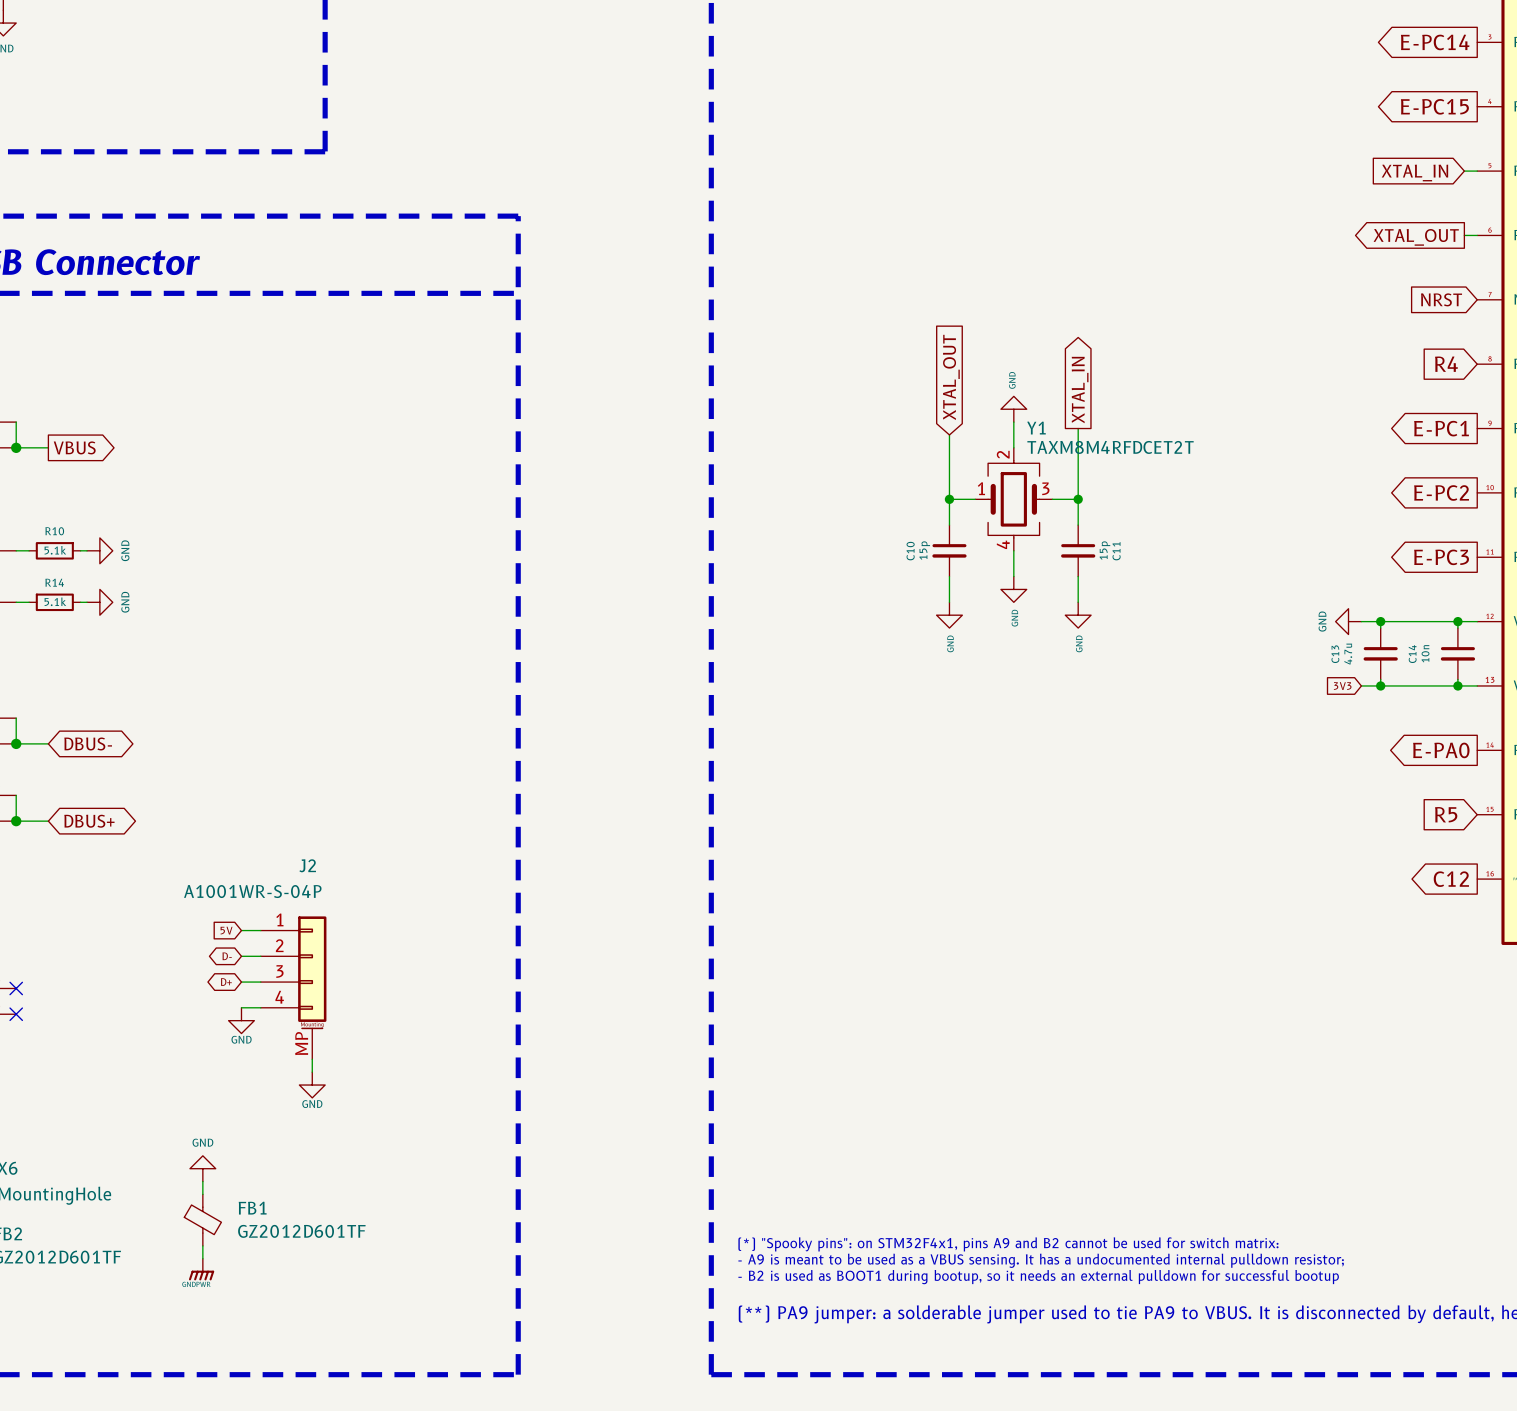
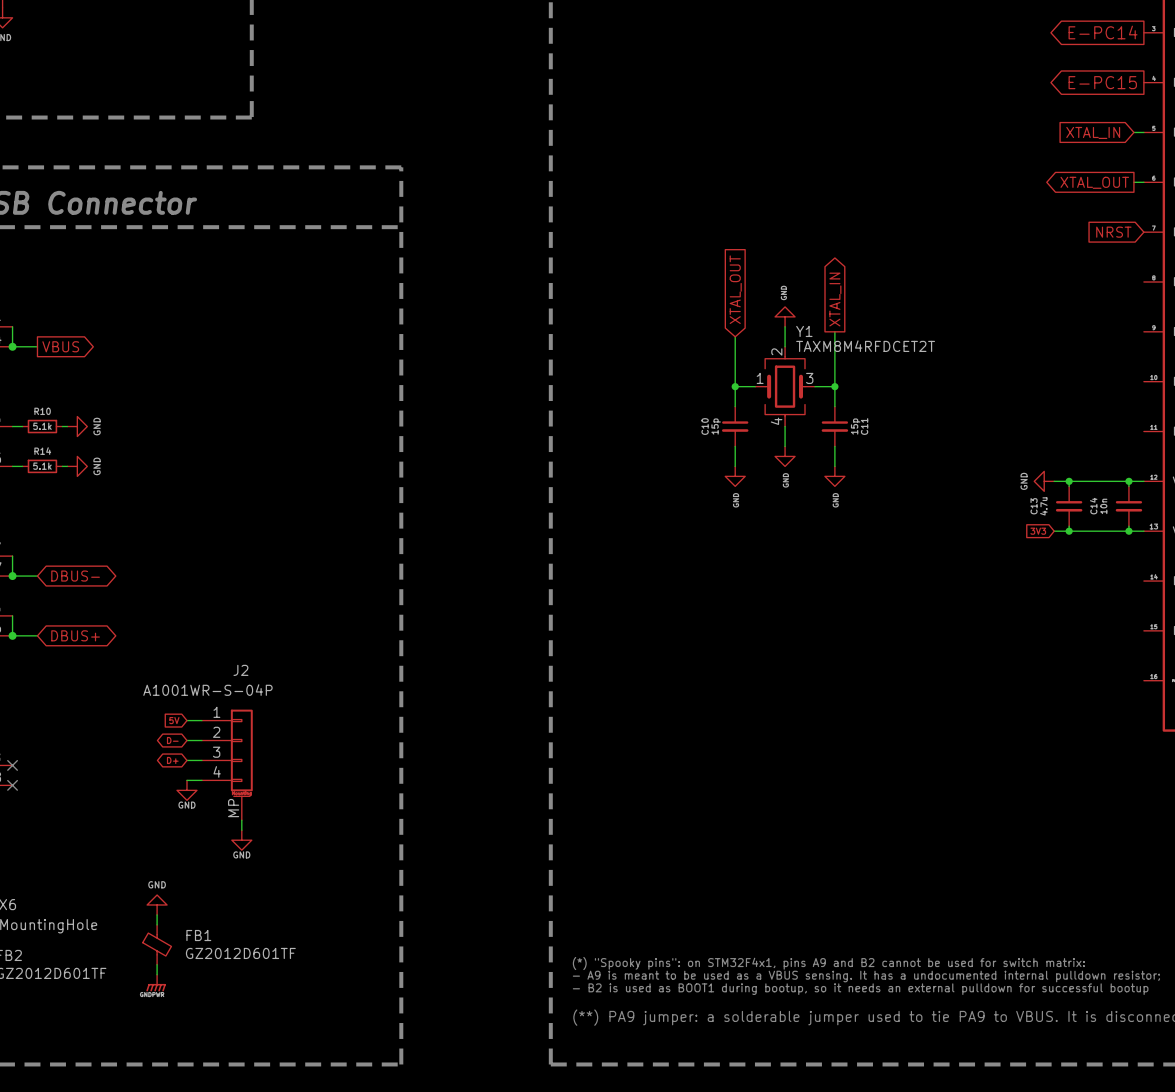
global label: R4 (1446, 364) -> none
global label: E-PC1 (1441, 428) -> none
global label: E-PC2 (1441, 492) -> none
global label: E-PC3 (1441, 557) -> none
global label: E-PA0 (1441, 750) -> none
global label: R5 (1446, 814) -> none
global label: C12 (1451, 879) -> none

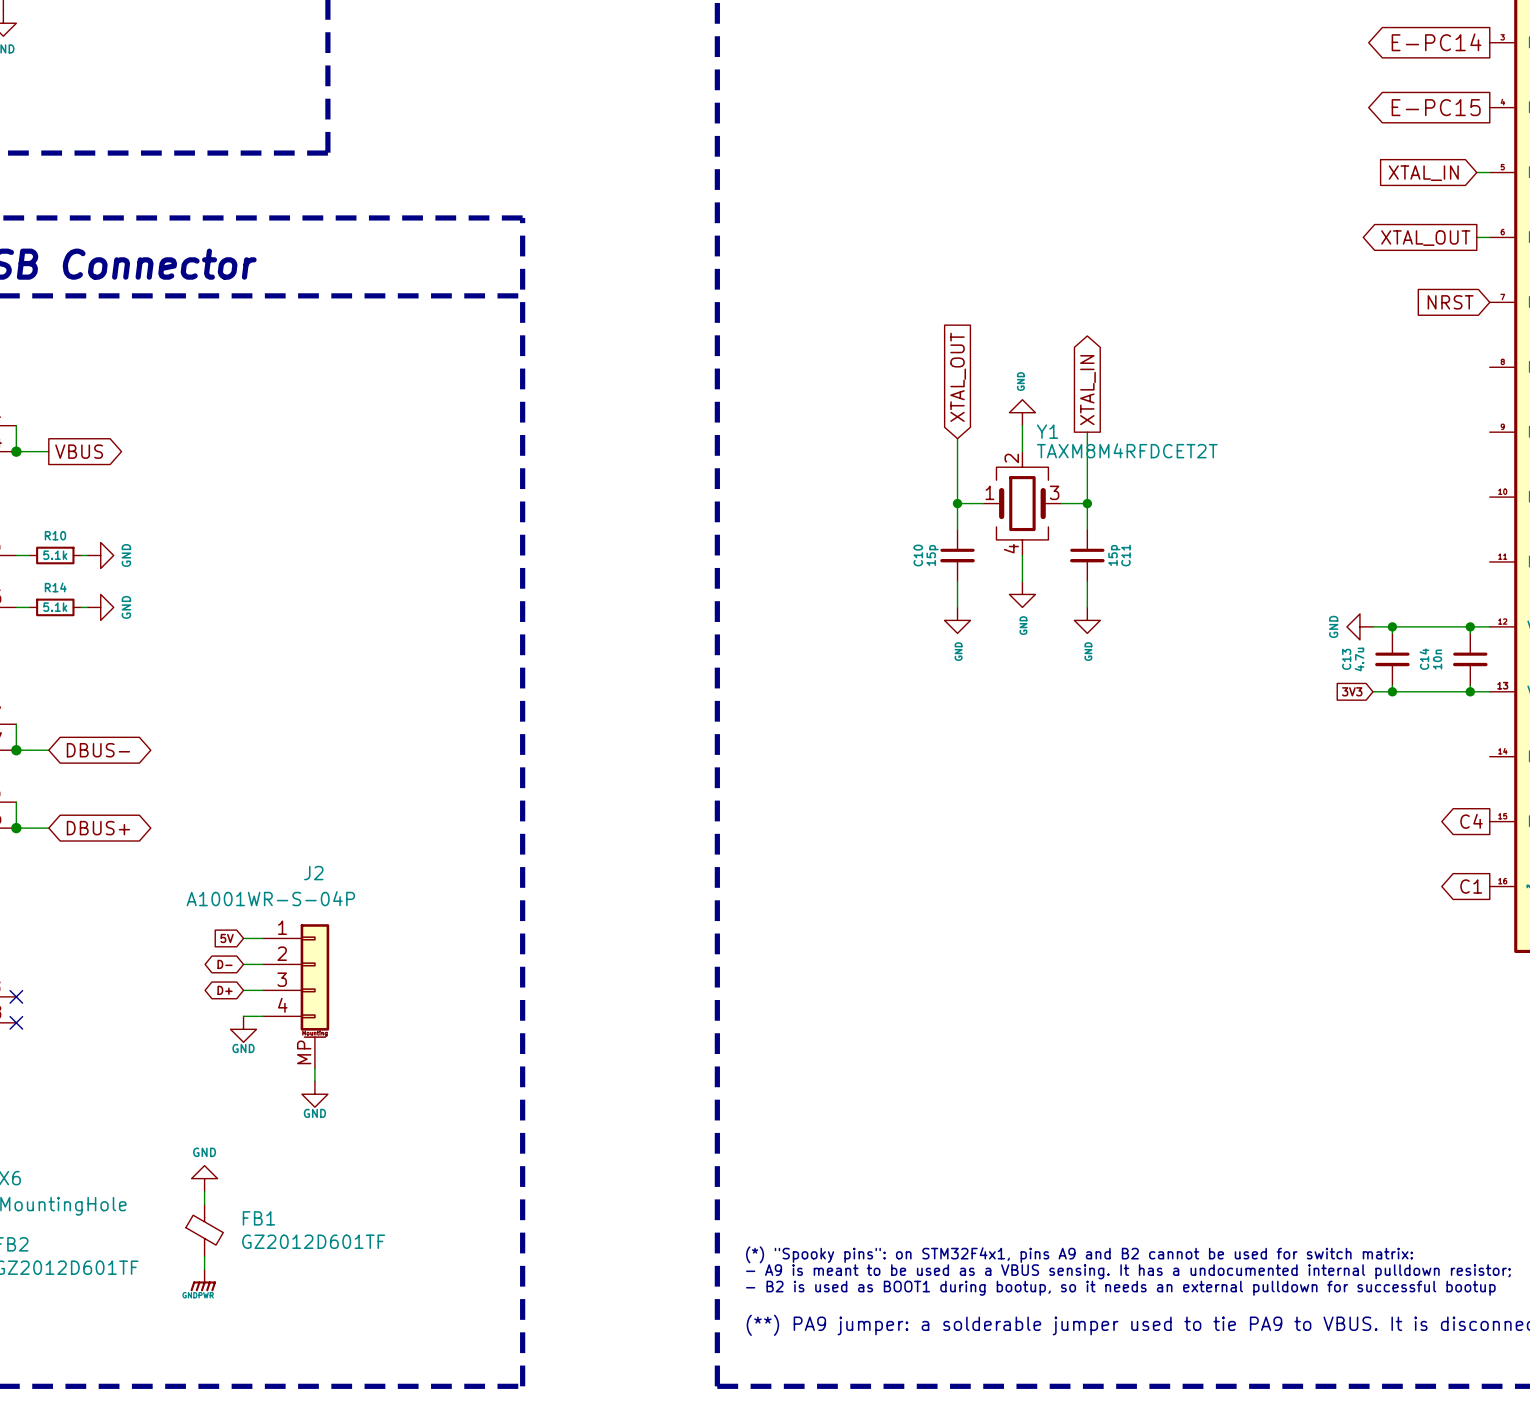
global label: none -> C4 (1471, 821)
global label: none -> C1 (1471, 886)

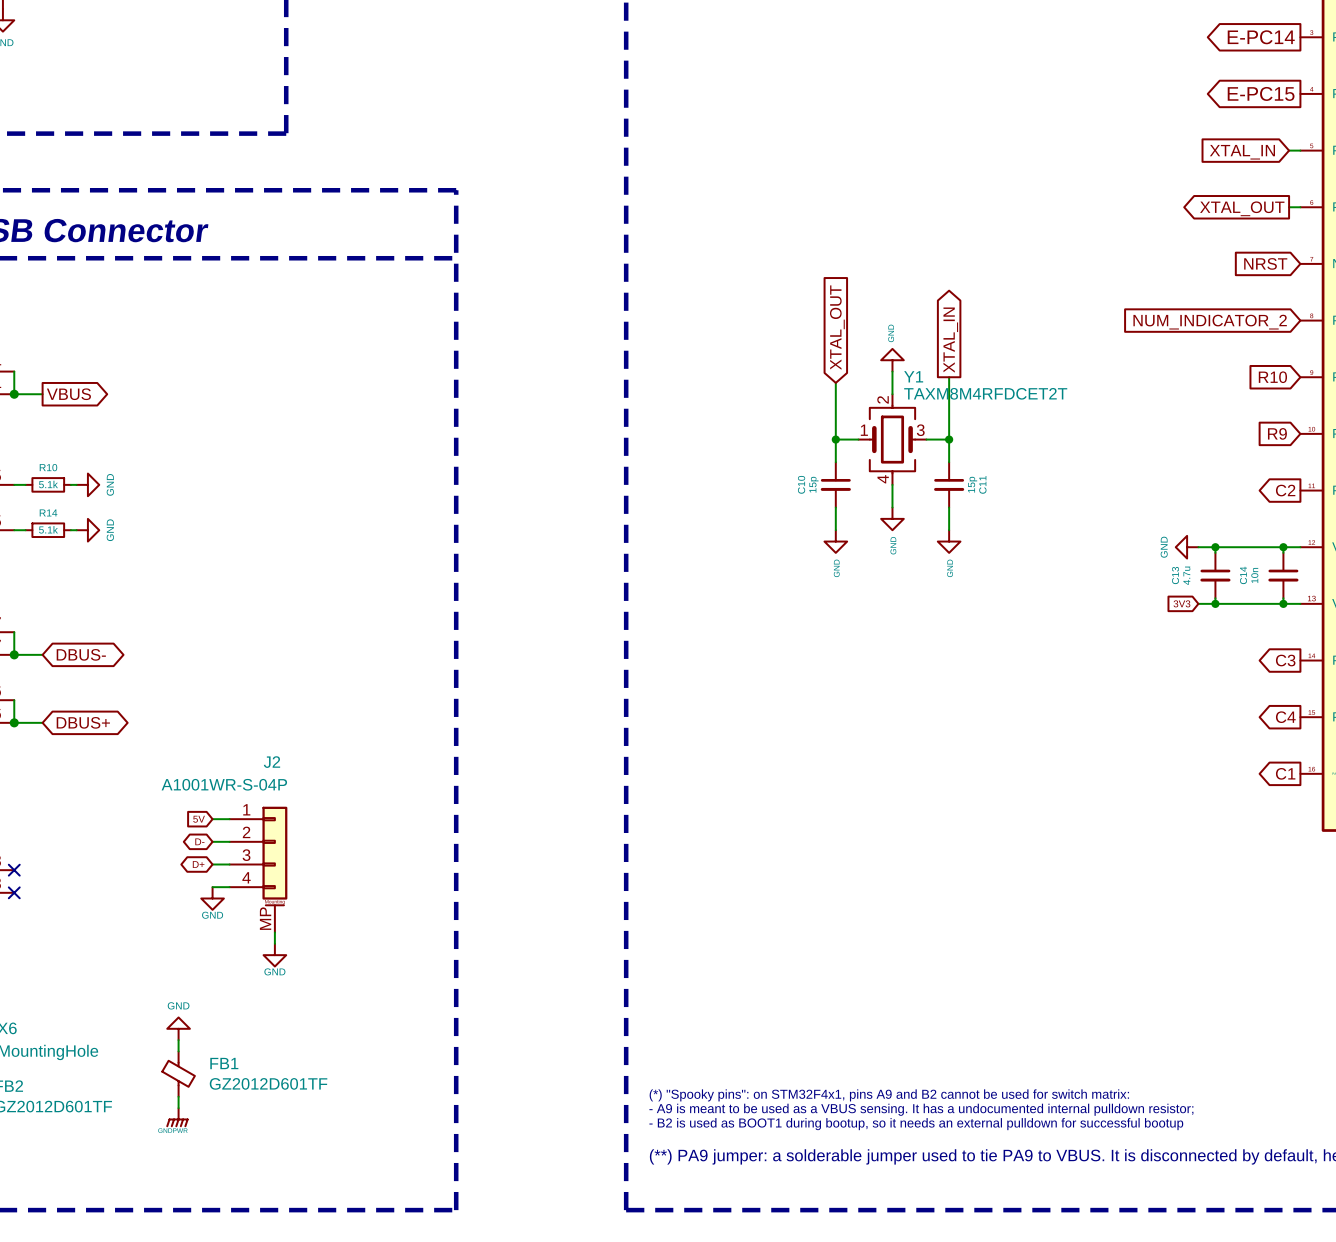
global label: none -> NUM_INDICATOR_2 (1210, 322)
global label: none -> R10 (1272, 377)
global label: none -> R9 (1277, 433)
global label: none -> C2 (1285, 490)
global label: none -> C3 (1285, 660)

